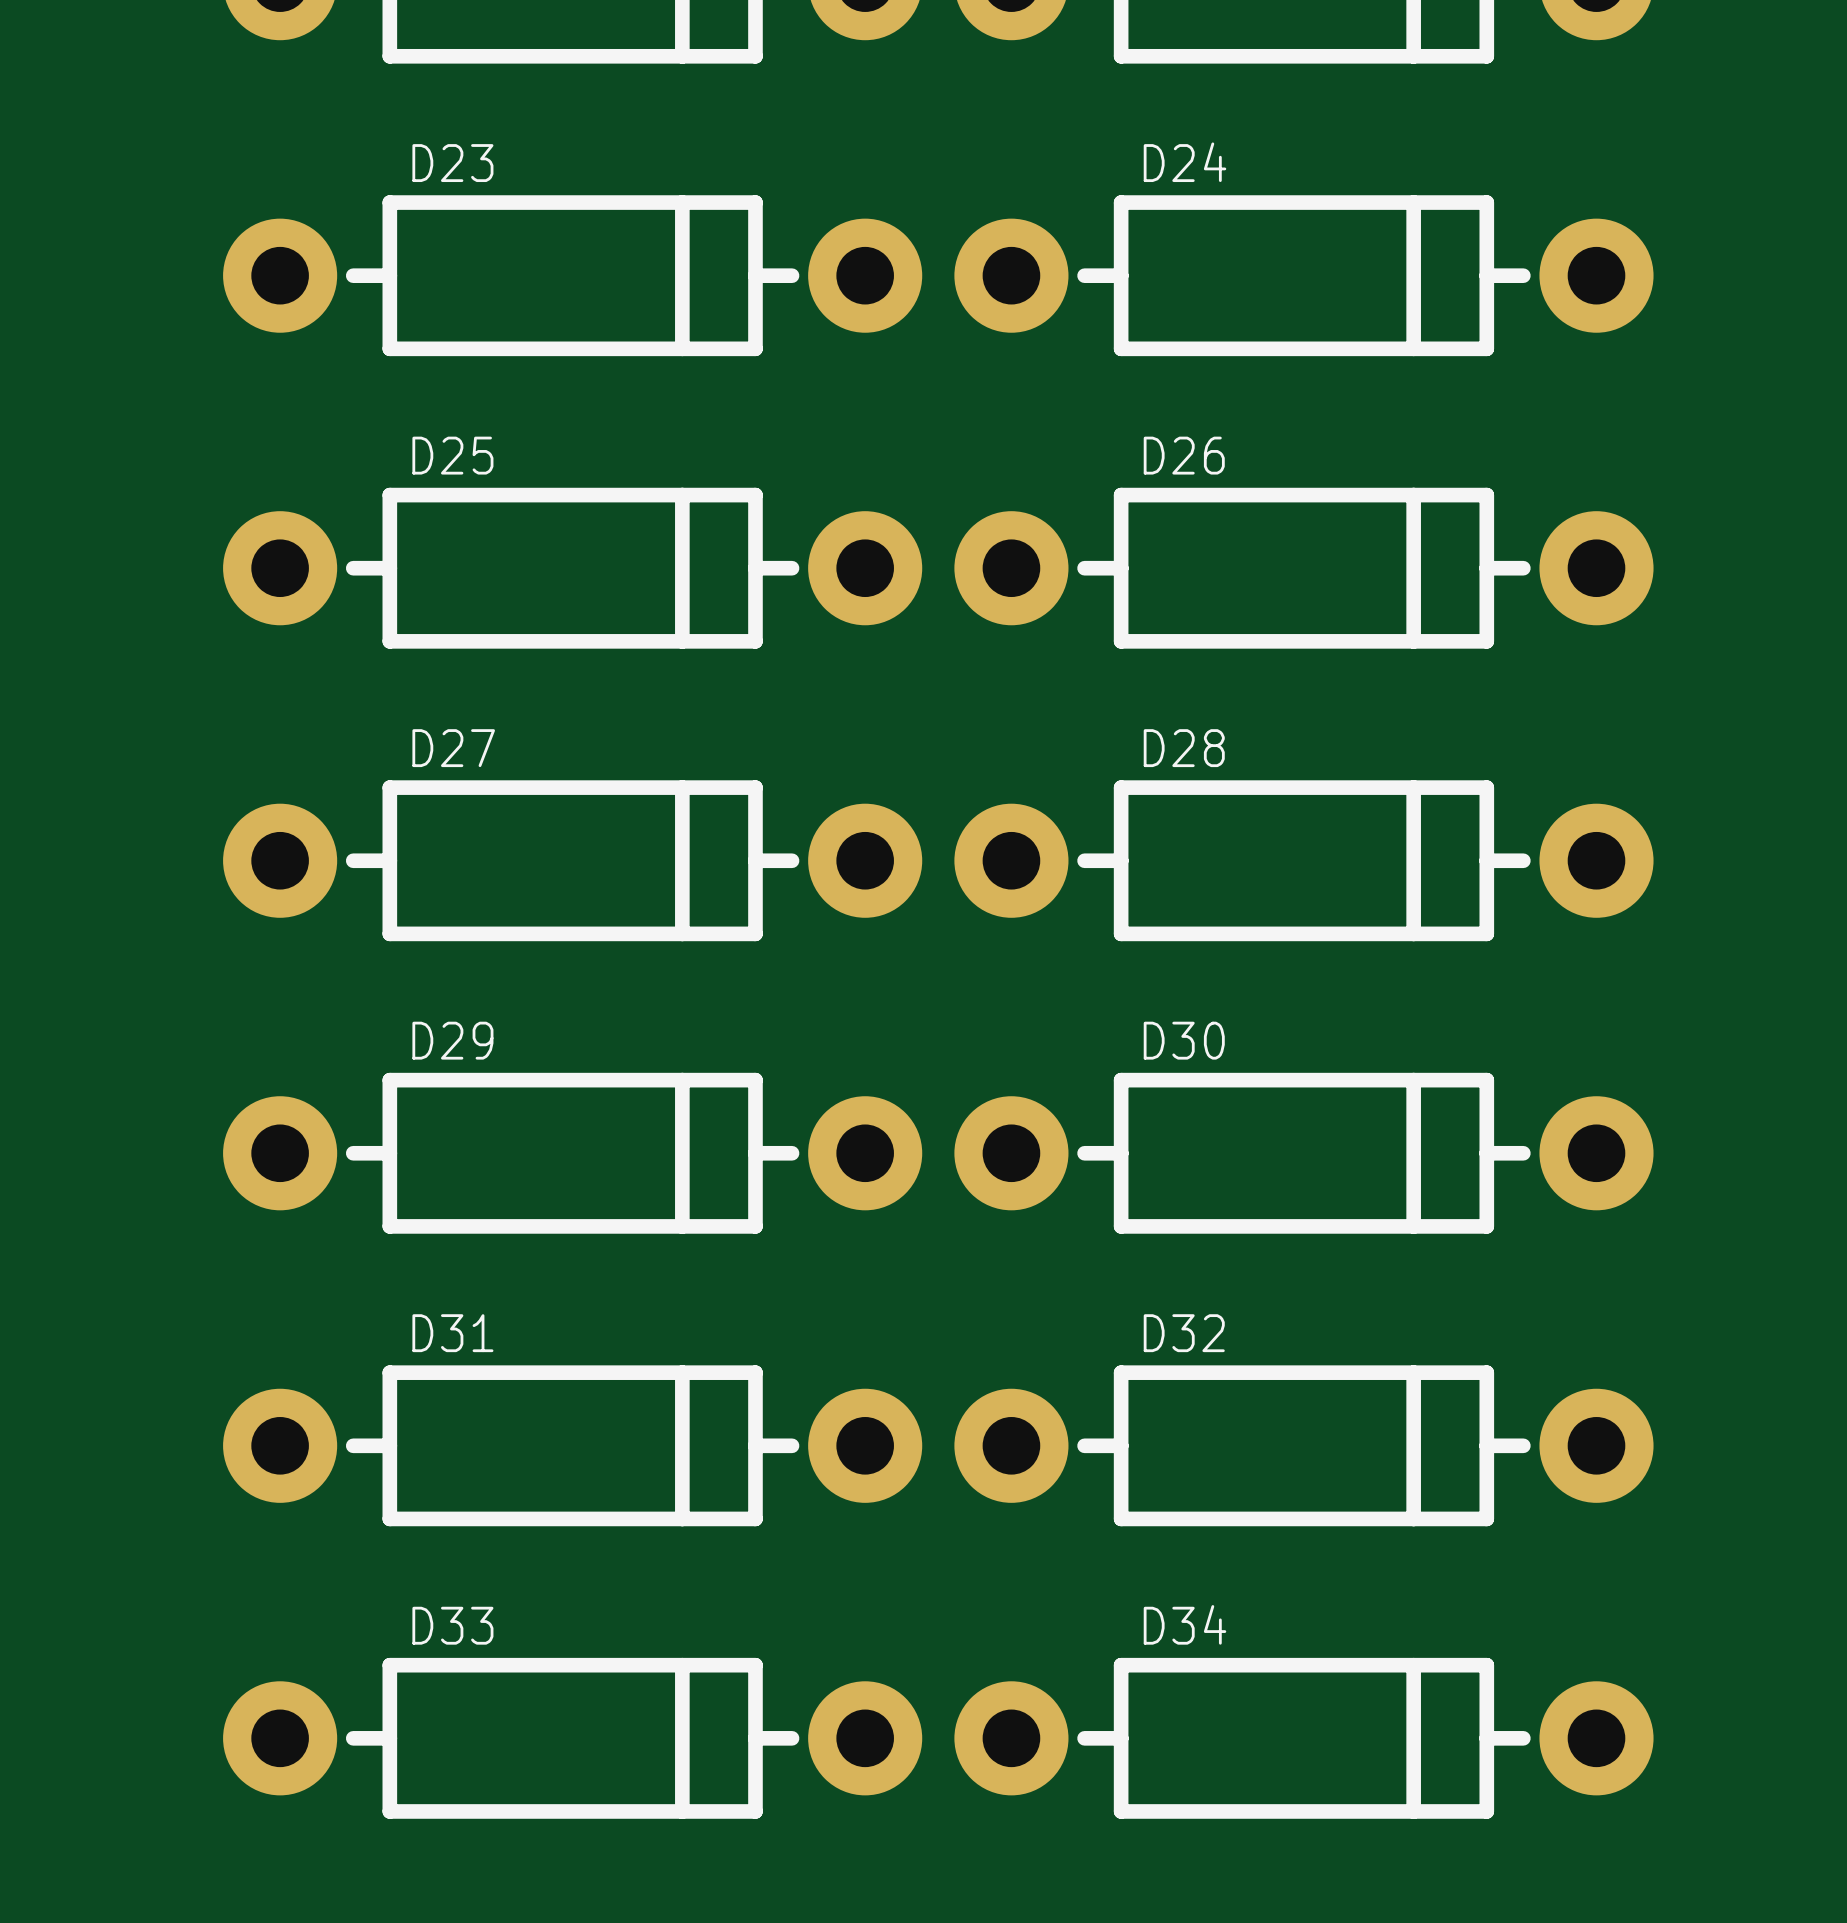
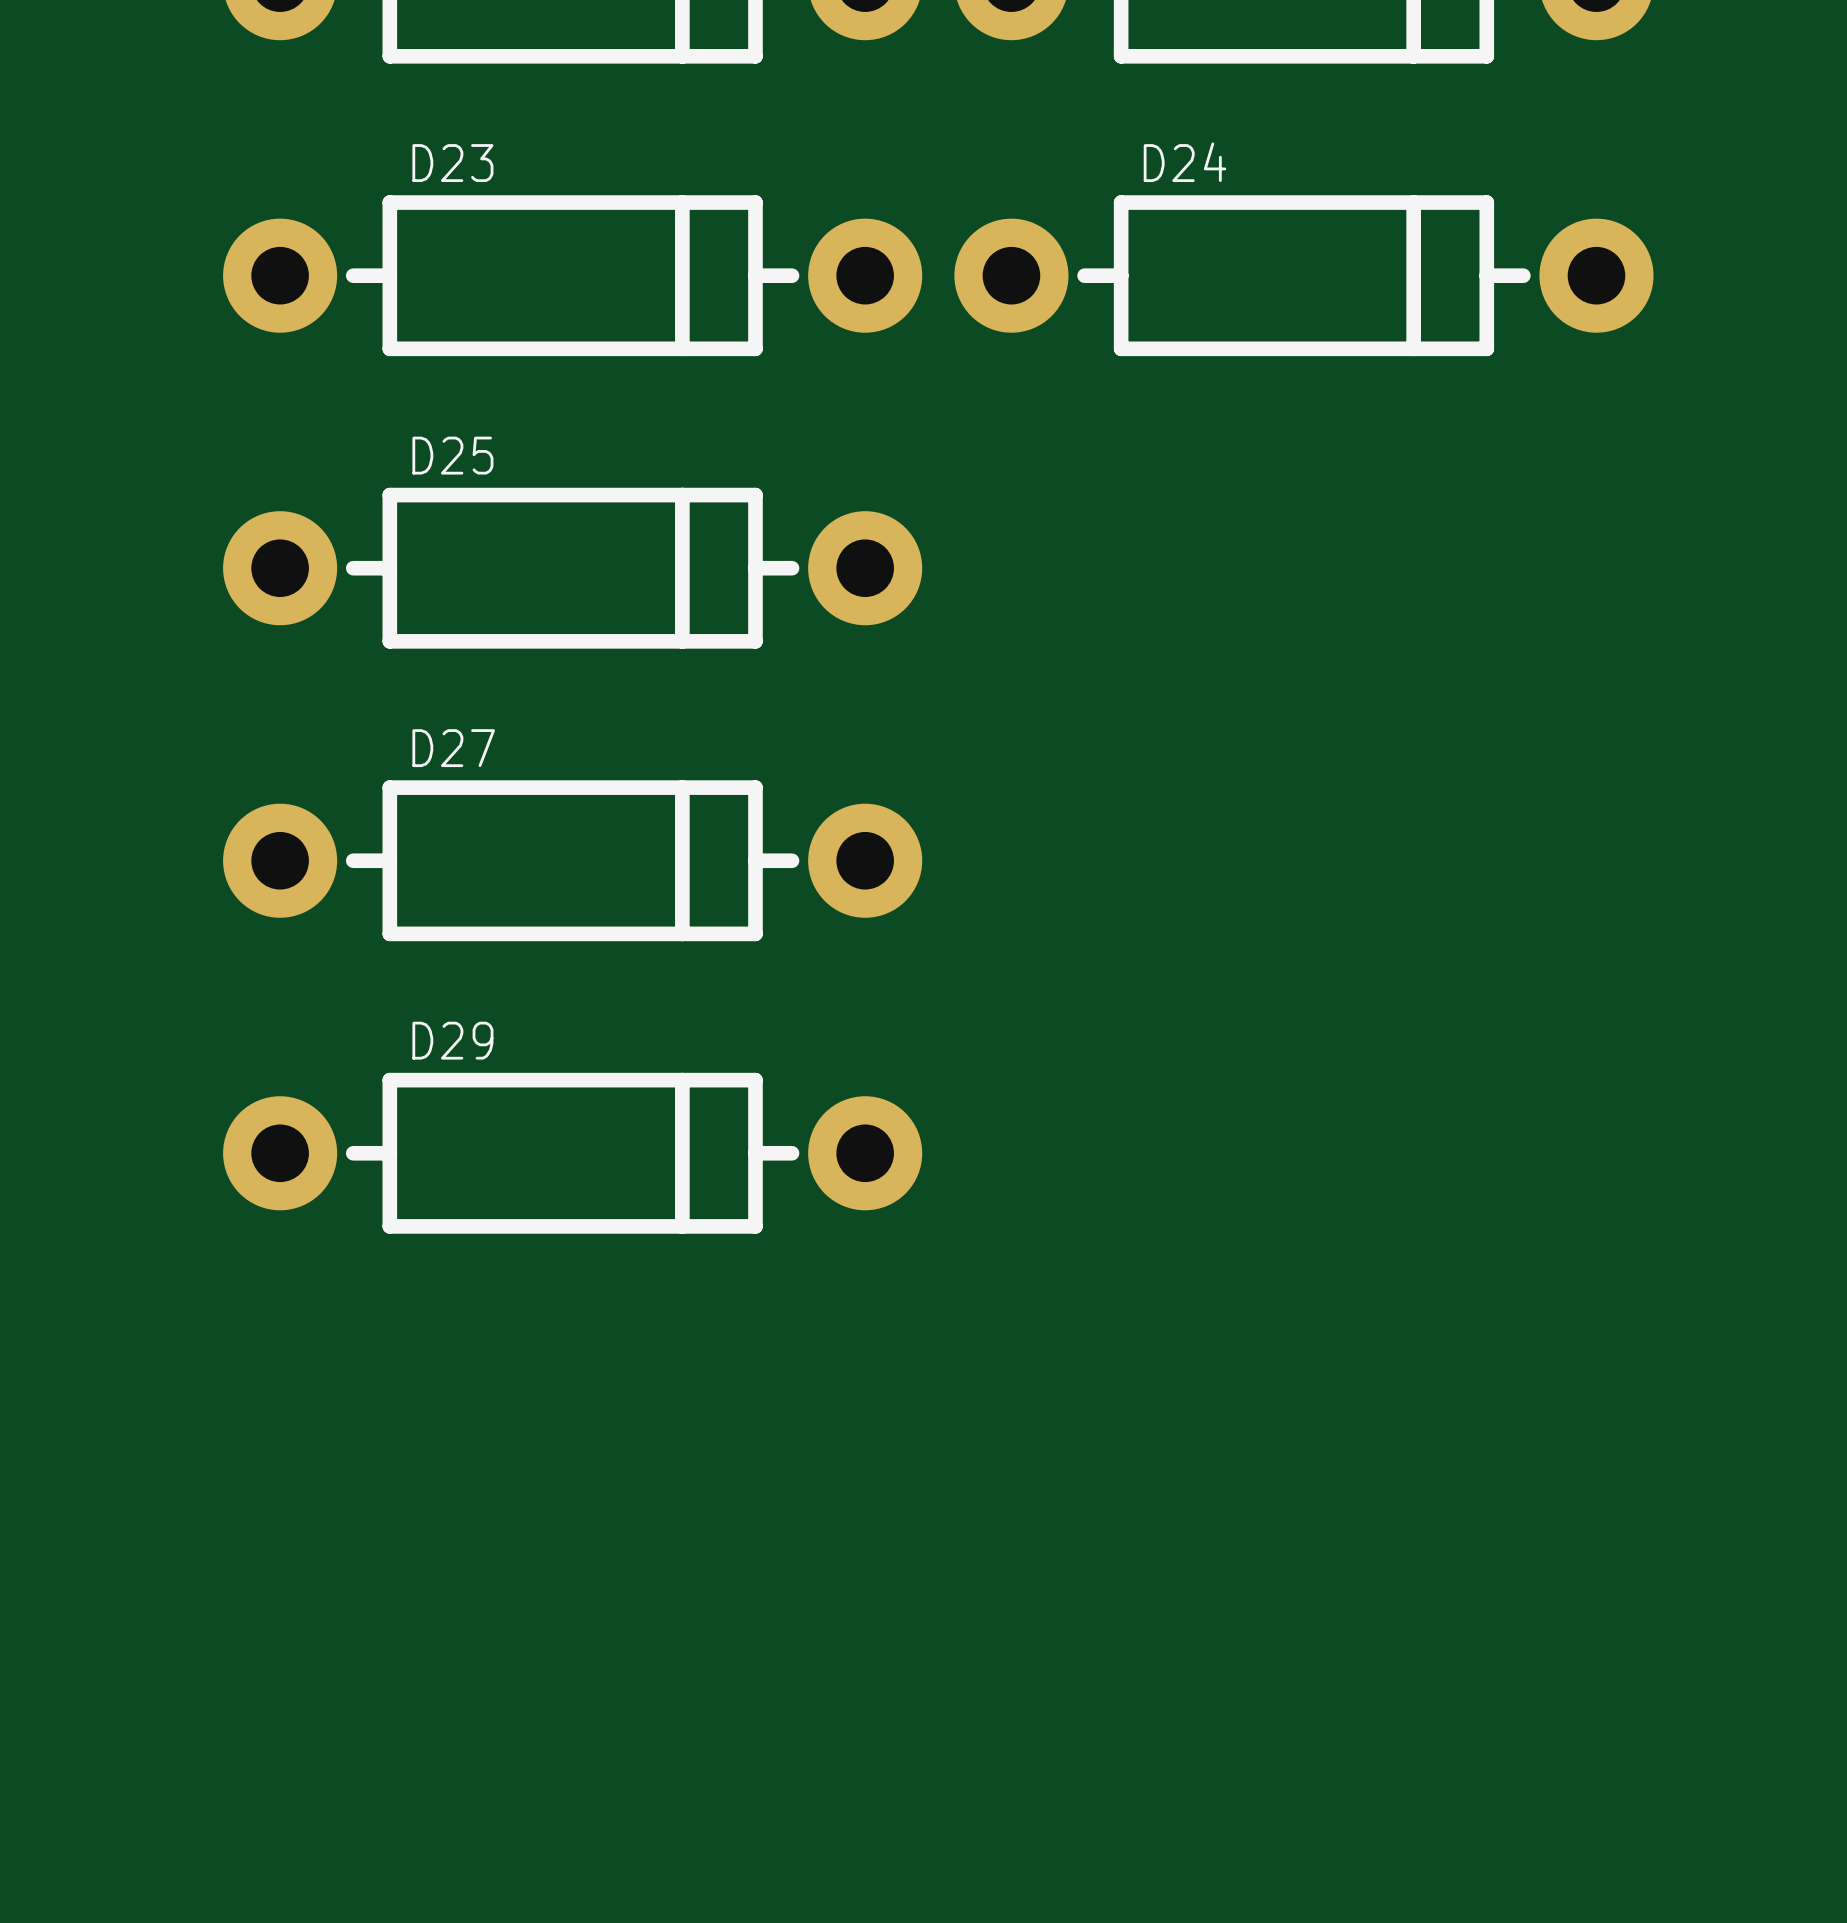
D26: (1303, 568) -> none
D28: (1303, 860) -> none
D30: (1303, 1153) -> none
D31: (572, 1445) -> none
D32: (1303, 1445) -> none
D33: (572, 1738) -> none
D34: (1303, 1738) -> none

